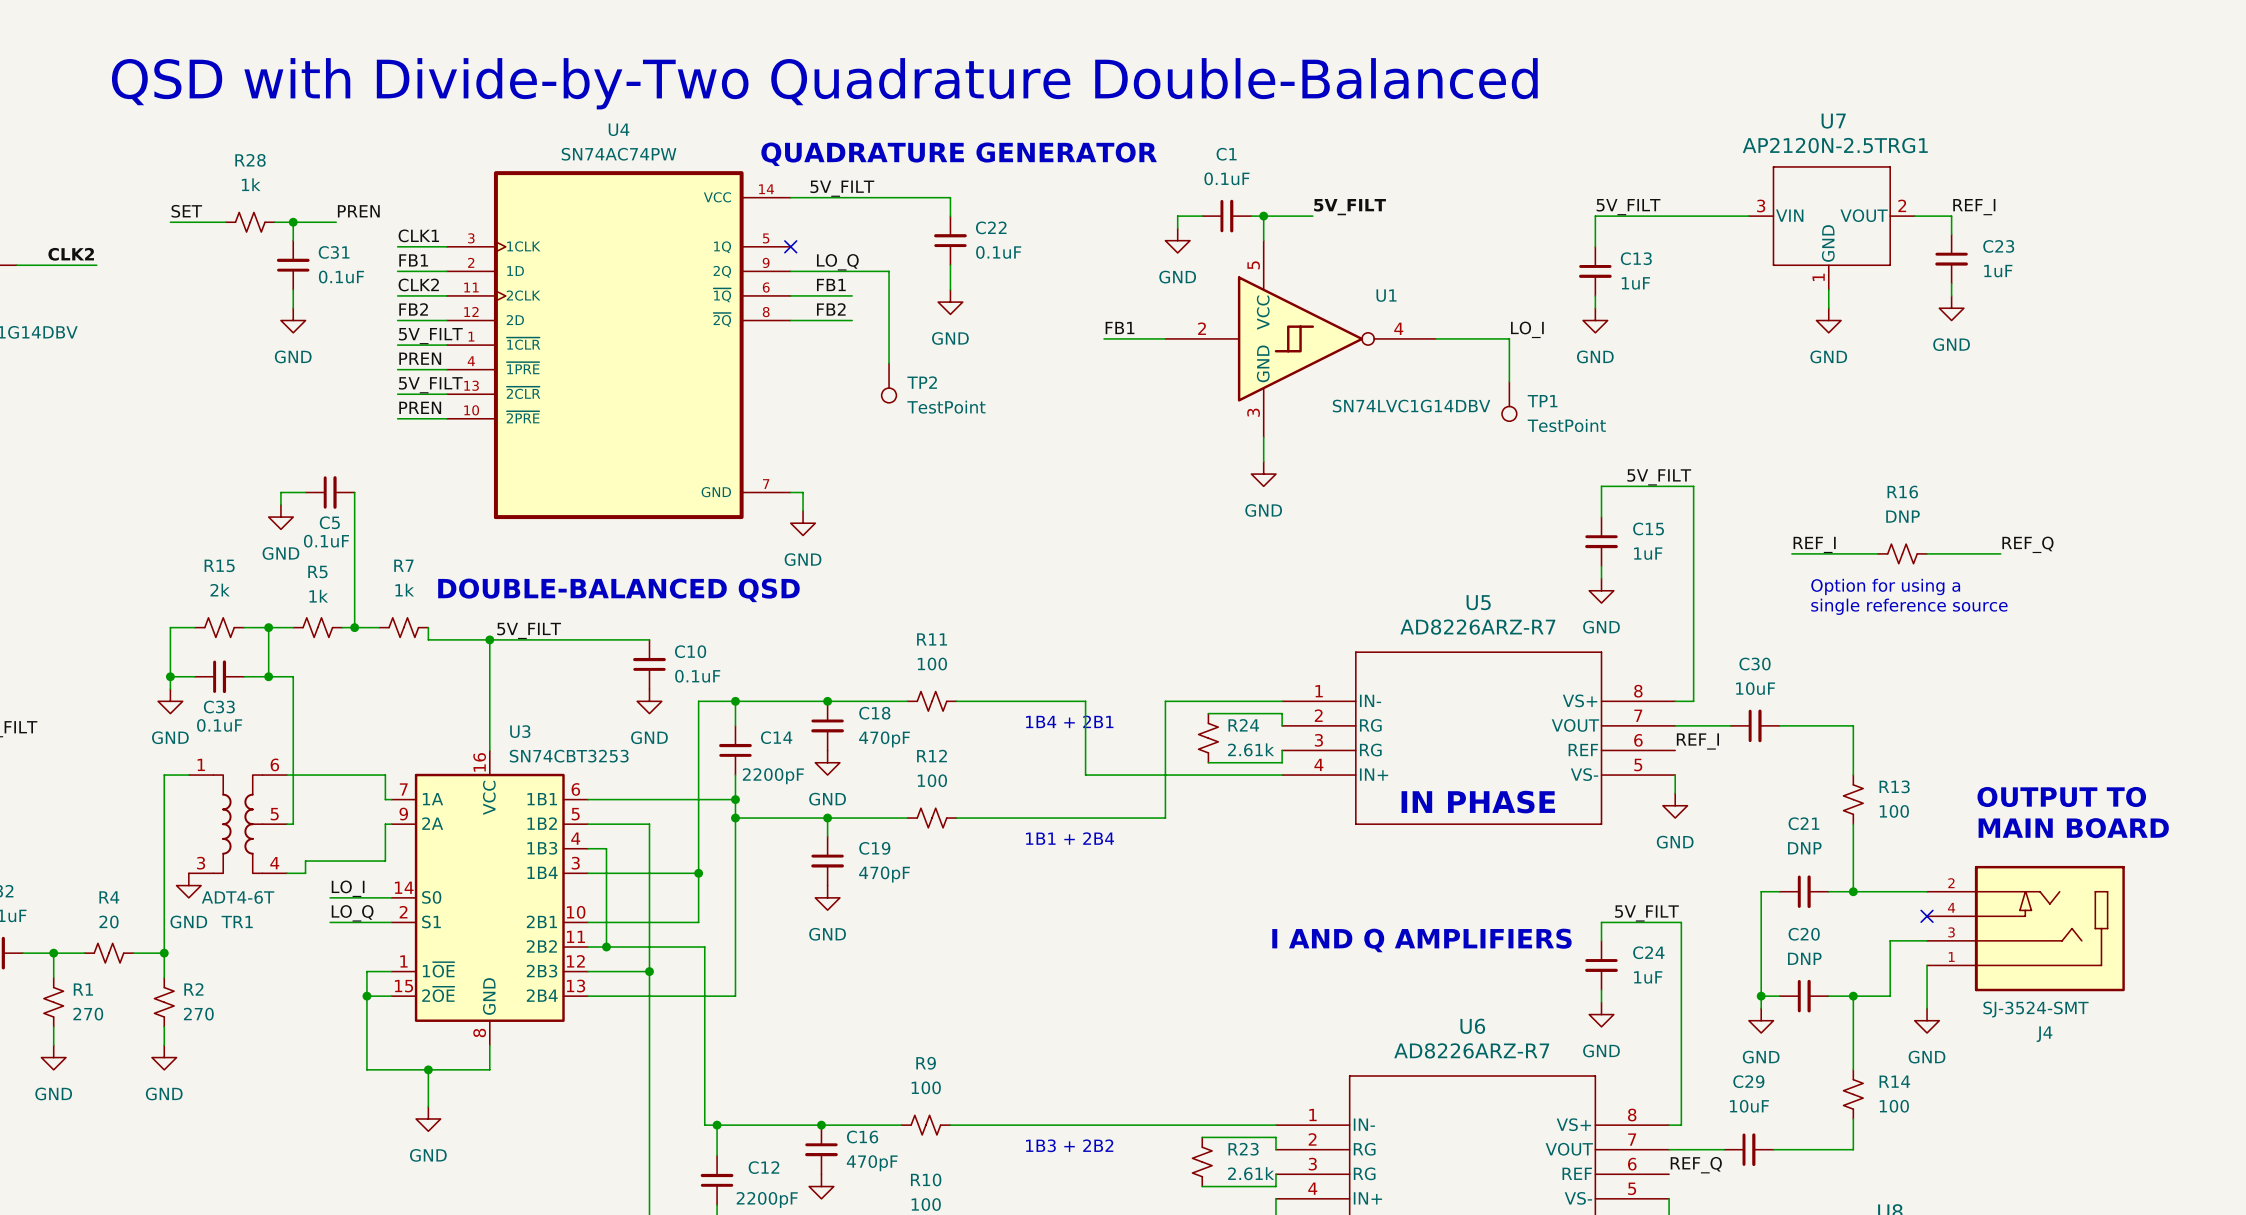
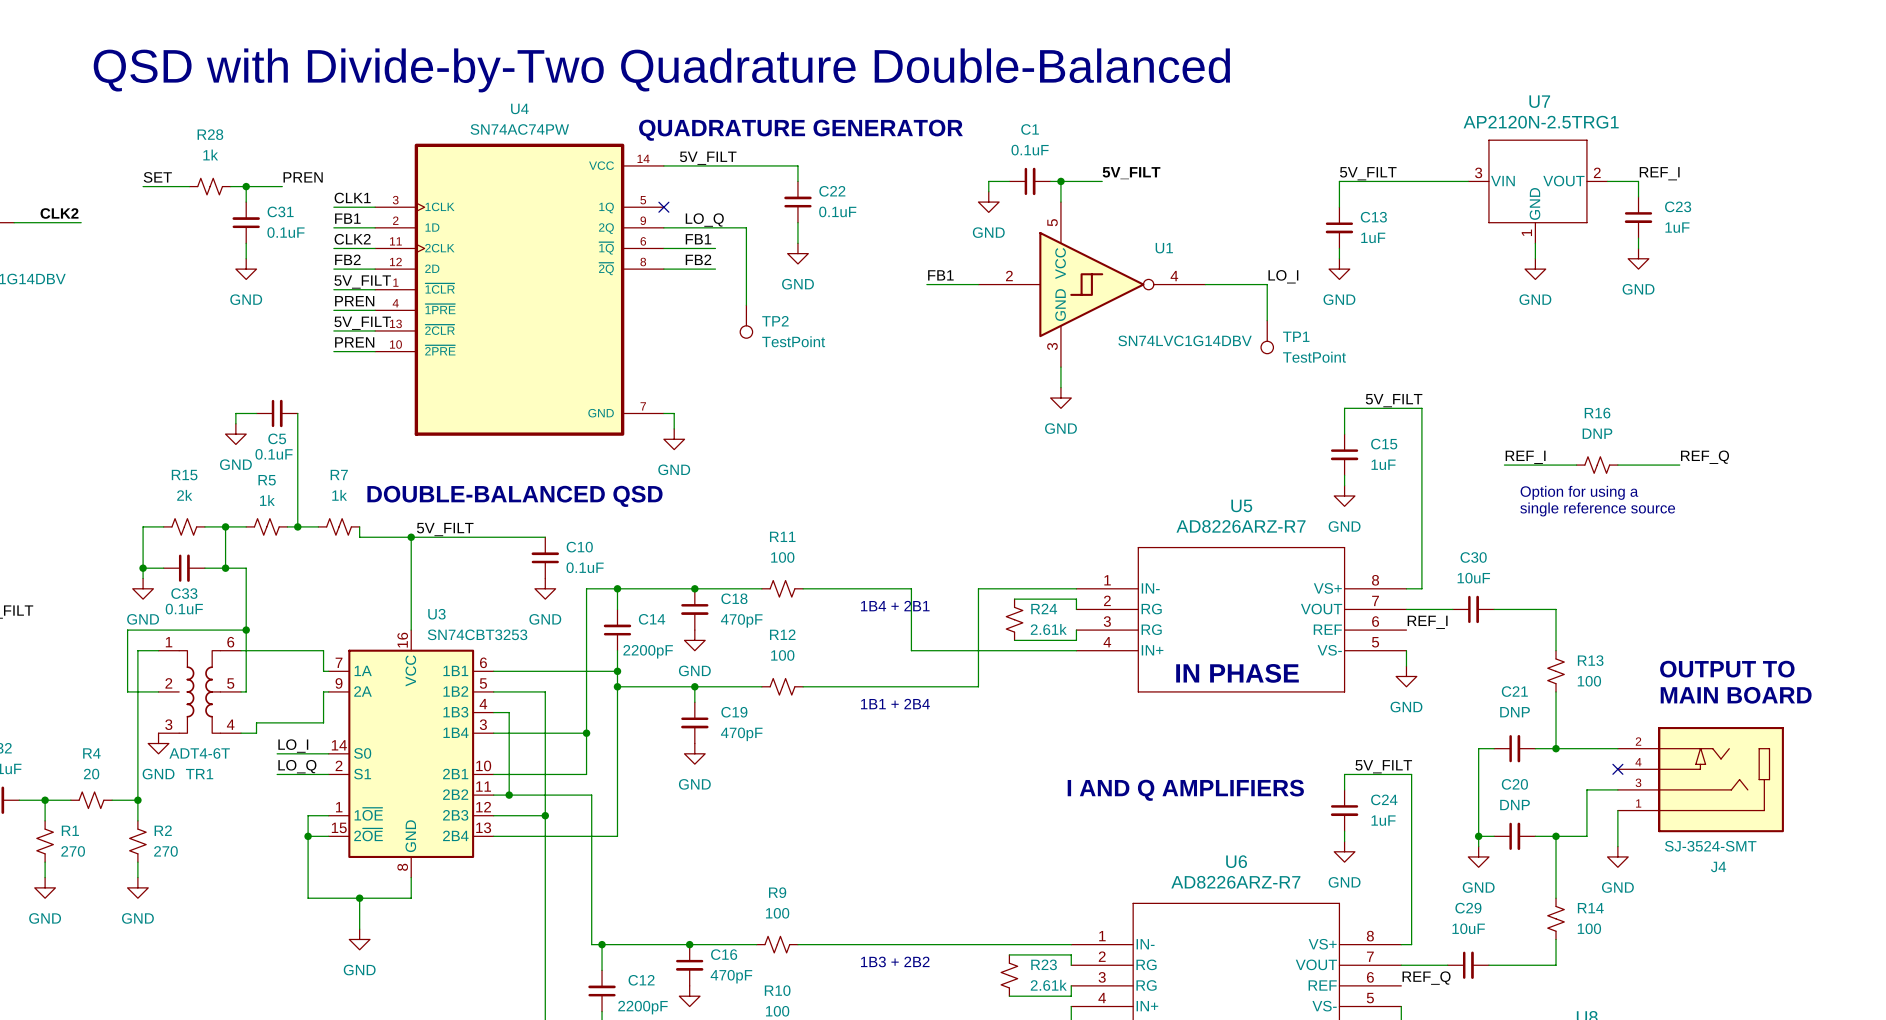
wire: none -> (246, 630) (127, 630) (127, 691) (158, 691)
junction: none -> (246, 630)
TR1 symbol: [188, 774, 288, 875] -> [158, 650, 242, 734]

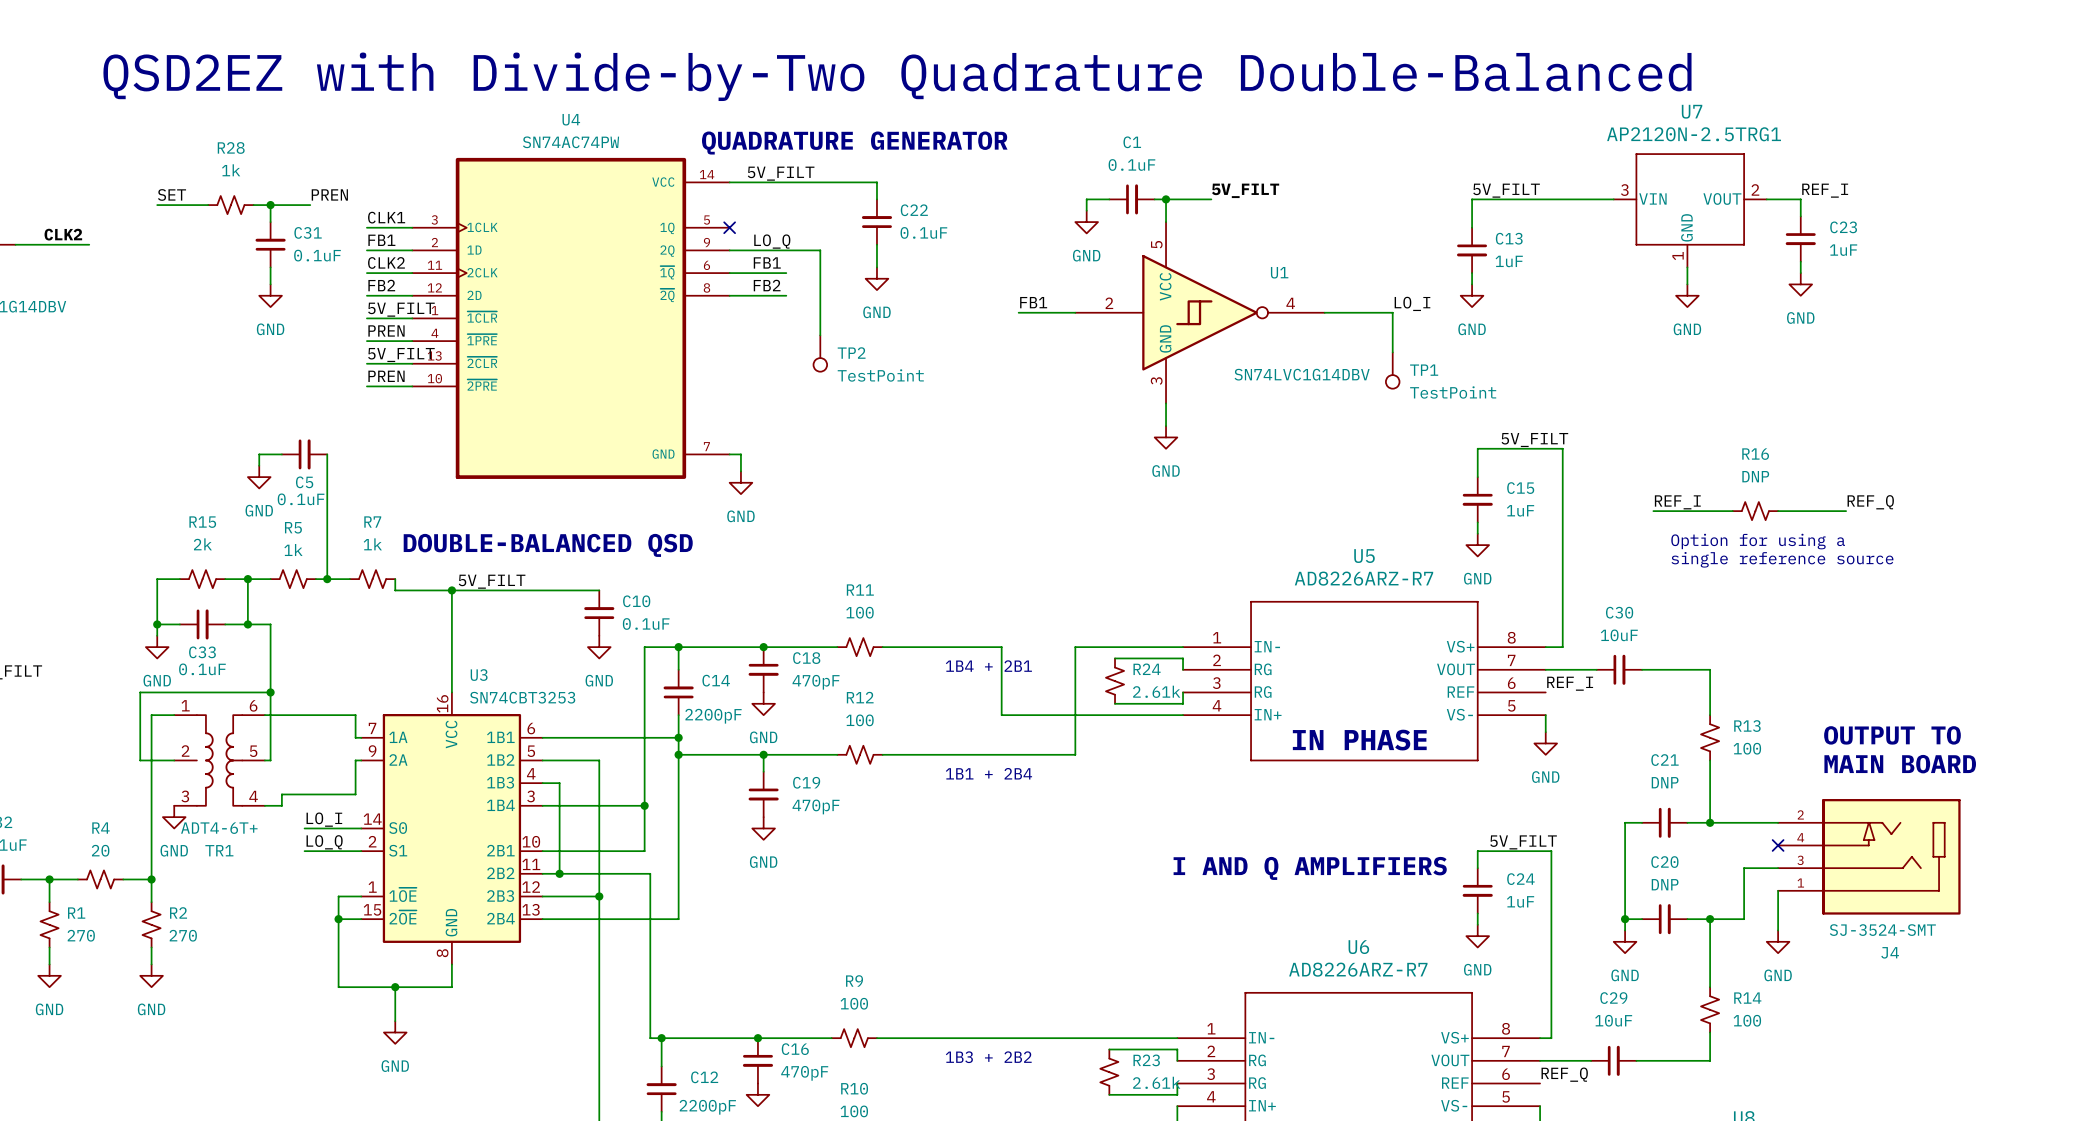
text: QSD with Divide-by-Two Quadrature Double-Balanced (661, 70) -> QSD2EZ with Divide-by-Two Quadrature Double-Balanced (897, 76)
TR1 value: ADT4-6T (199, 753) -> ADT4-6T+ (219, 828)

